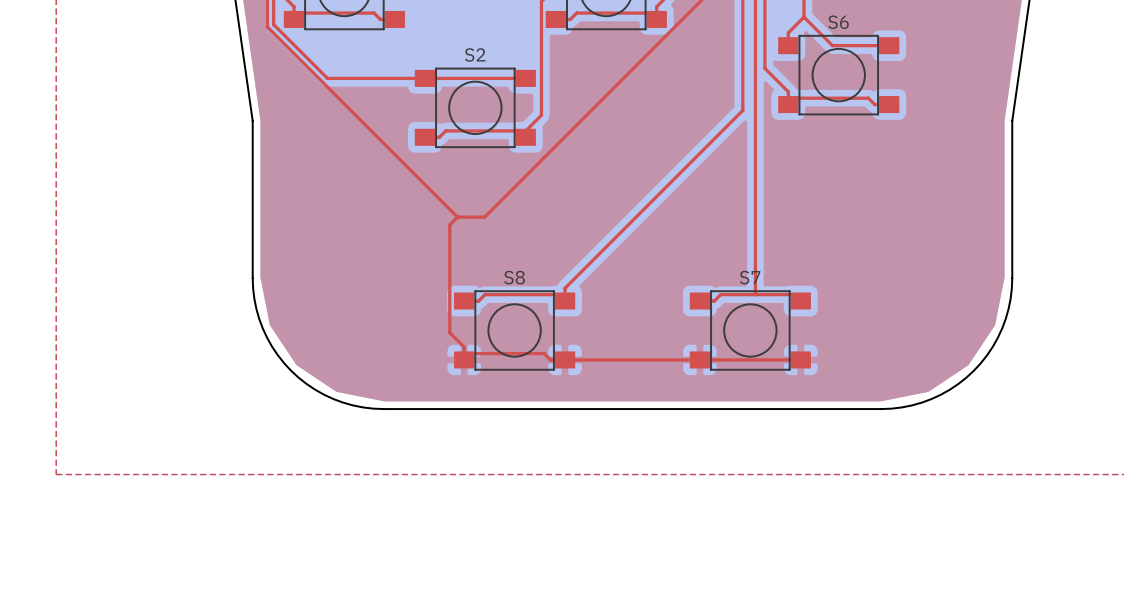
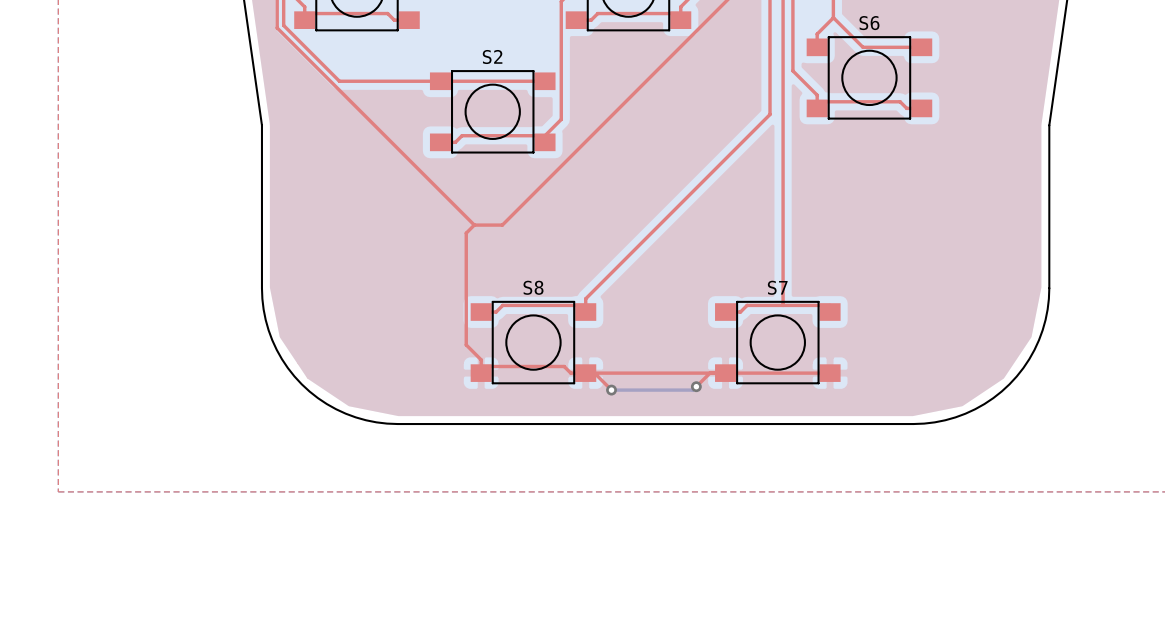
top track: none -> (594, 373) (611, 390)
top track: none -> (709, 373) (696, 386)
bottom track: none -> (696, 386) (692, 390) (611, 390)
via: none -> (696, 386)
via: none -> (611, 390)

